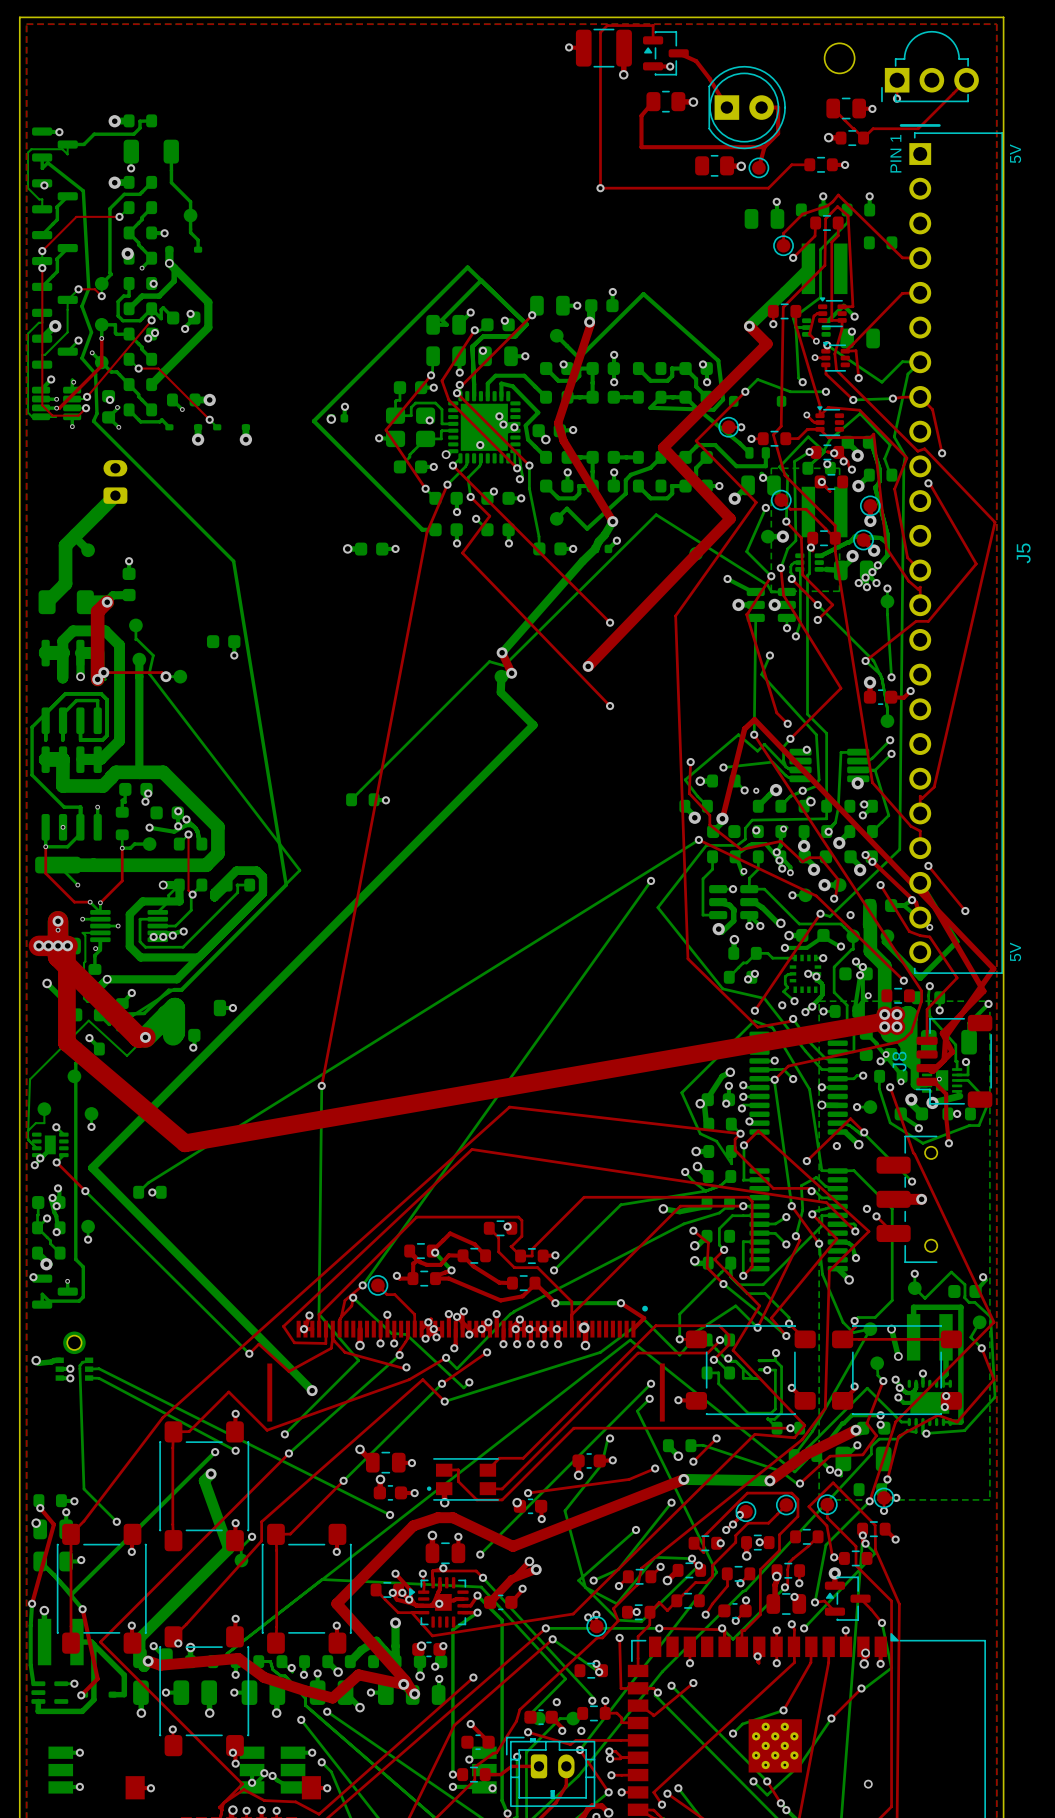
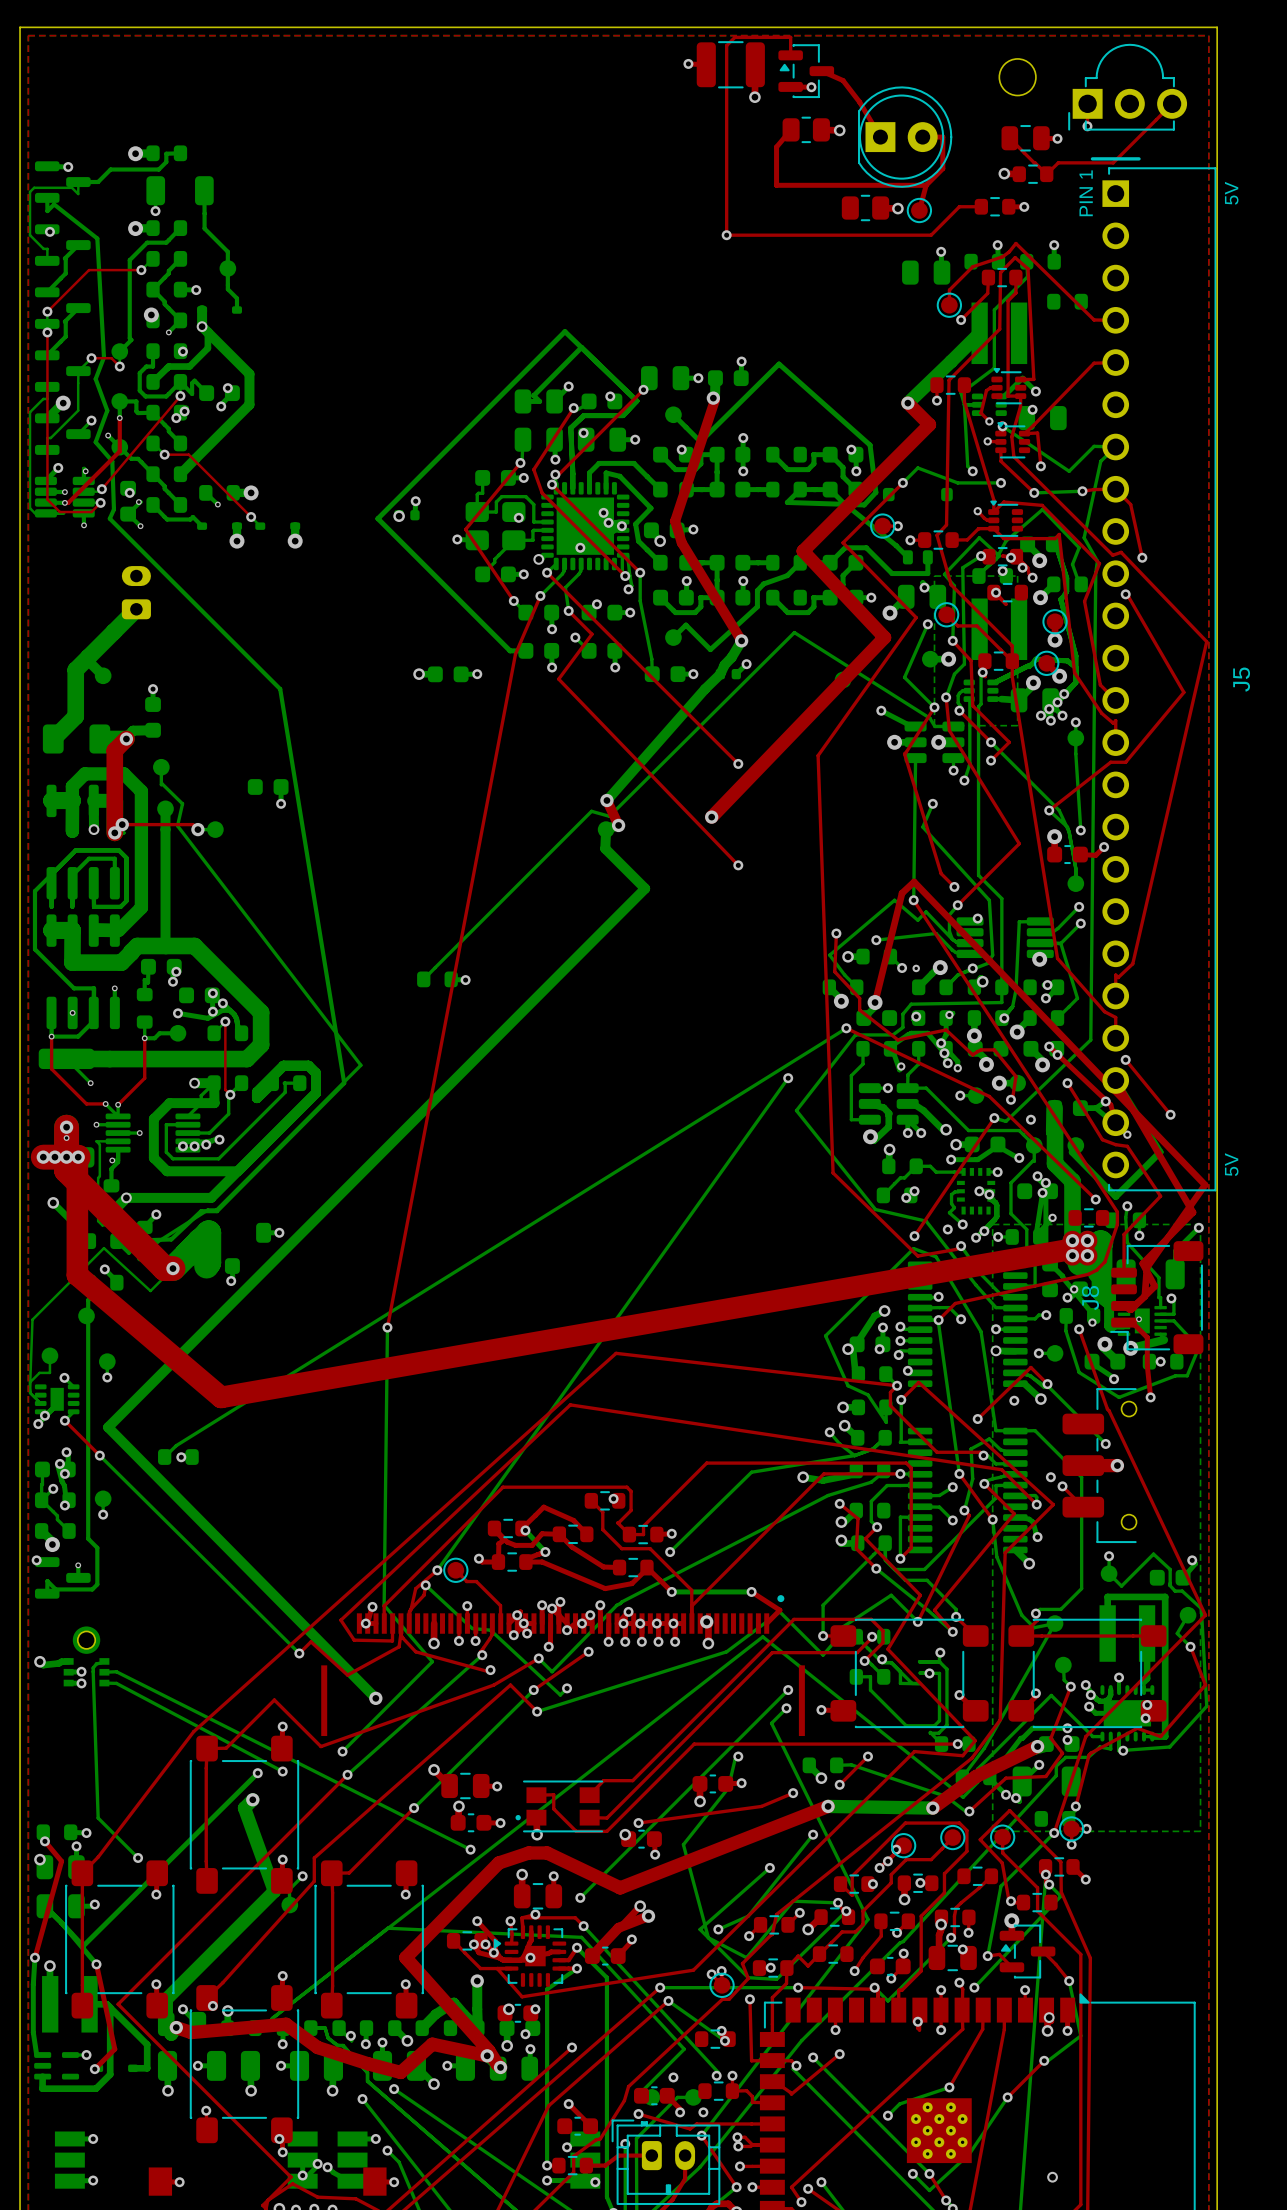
bottom track: (891, 1329) (898, 1356) -> none
via: (891, 1329) -> none
via: (898, 1356) -> none

